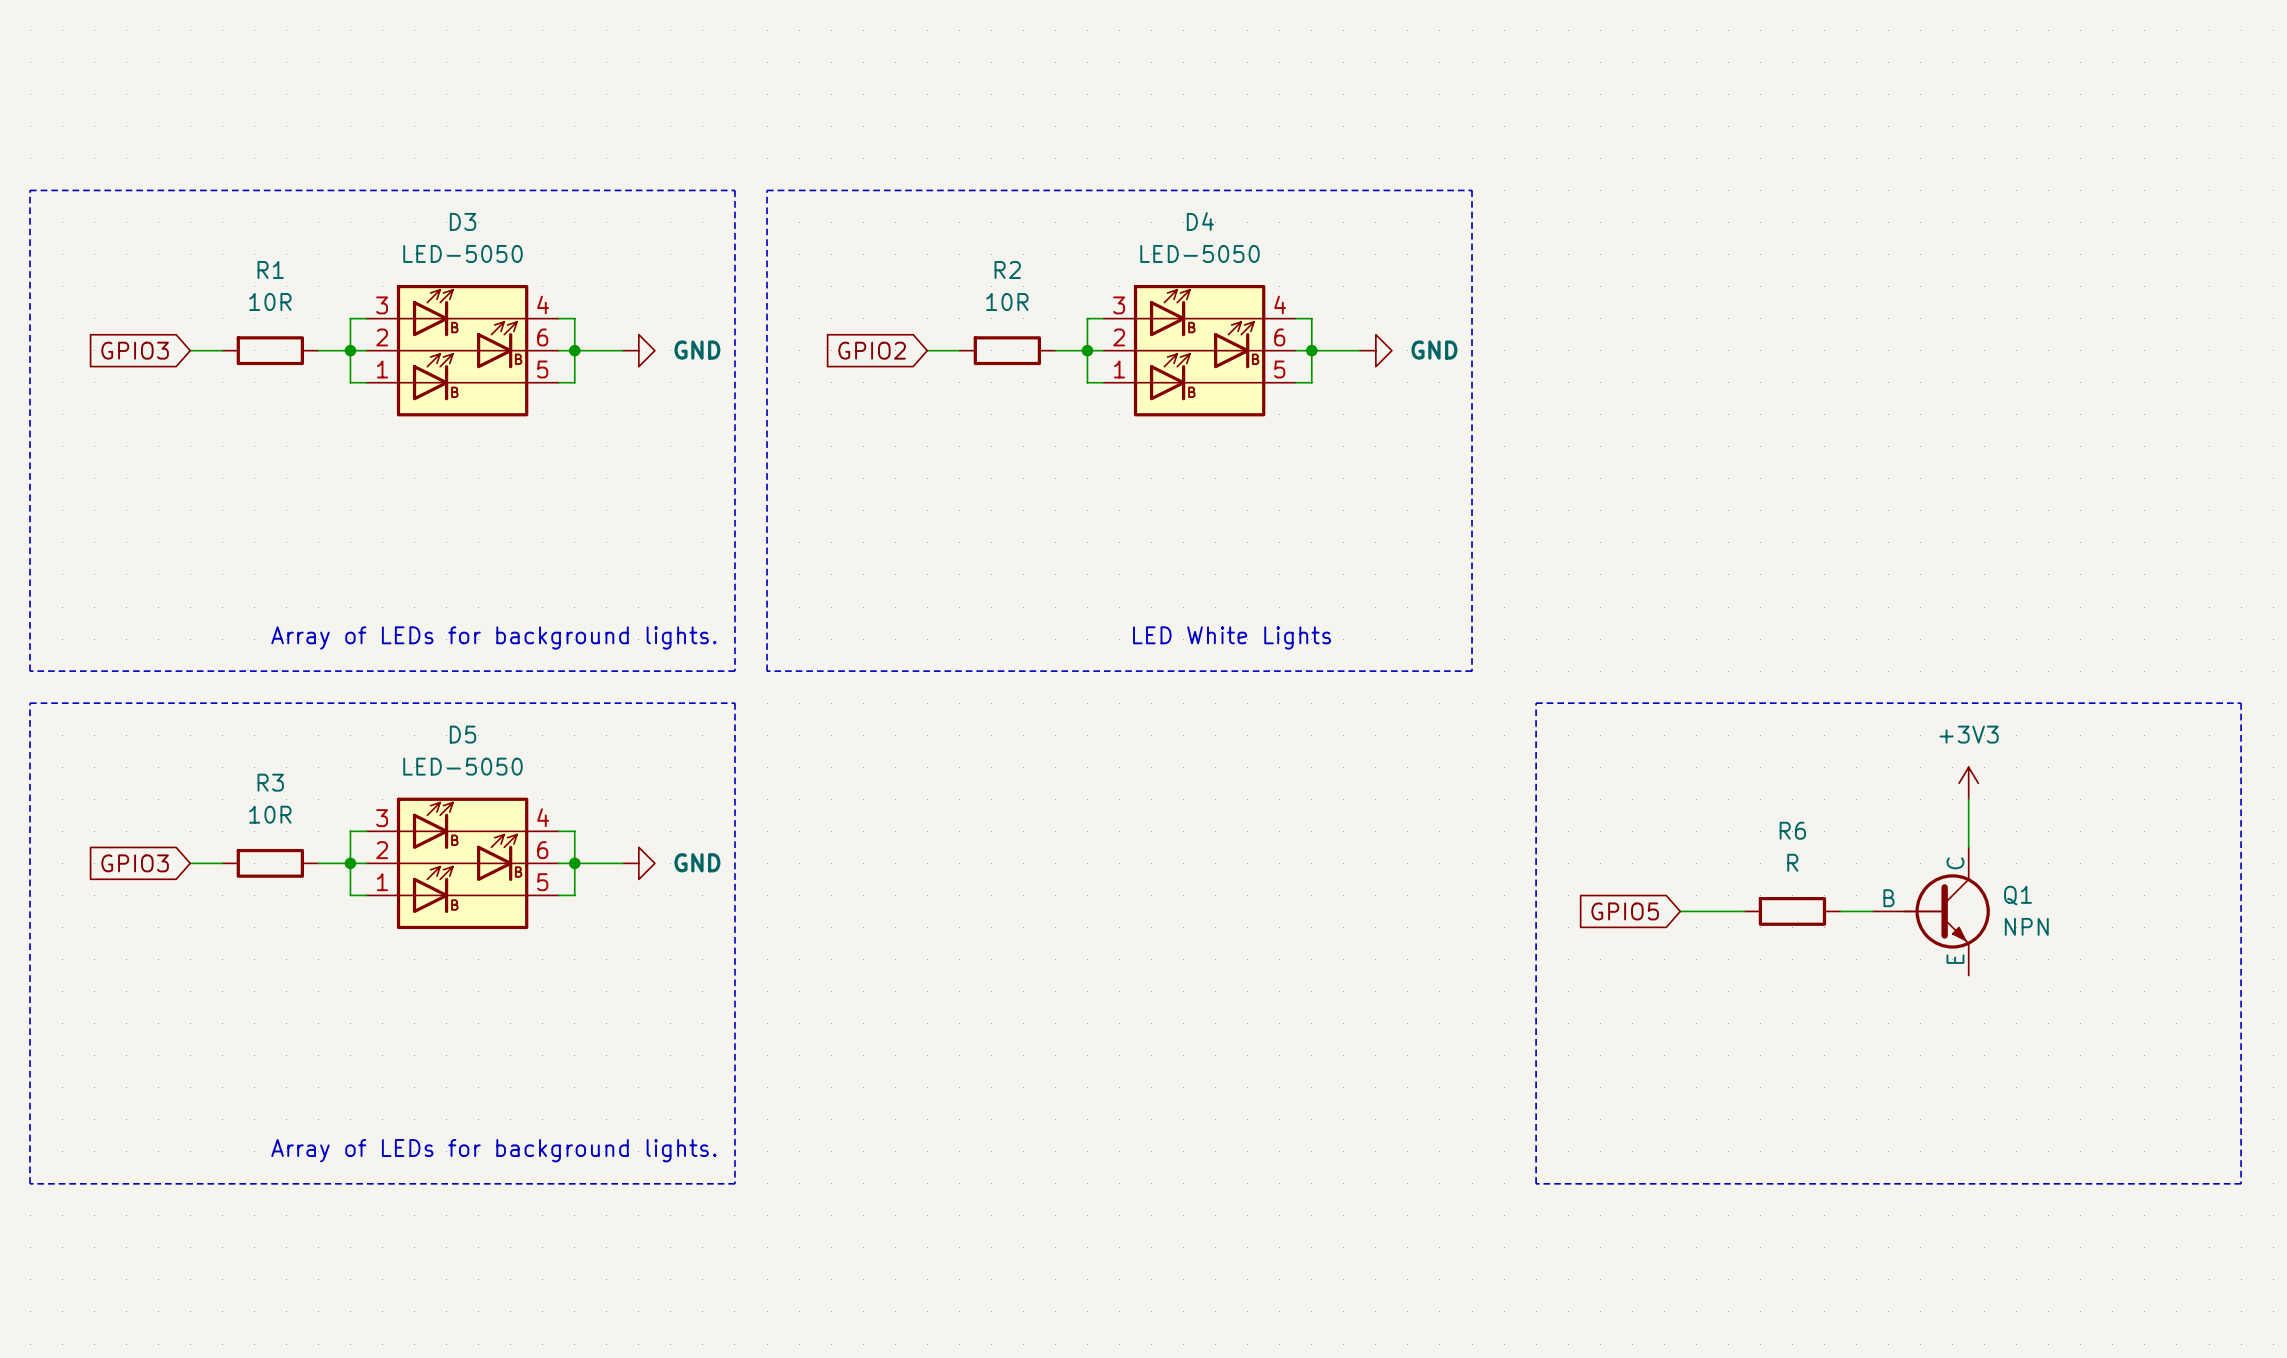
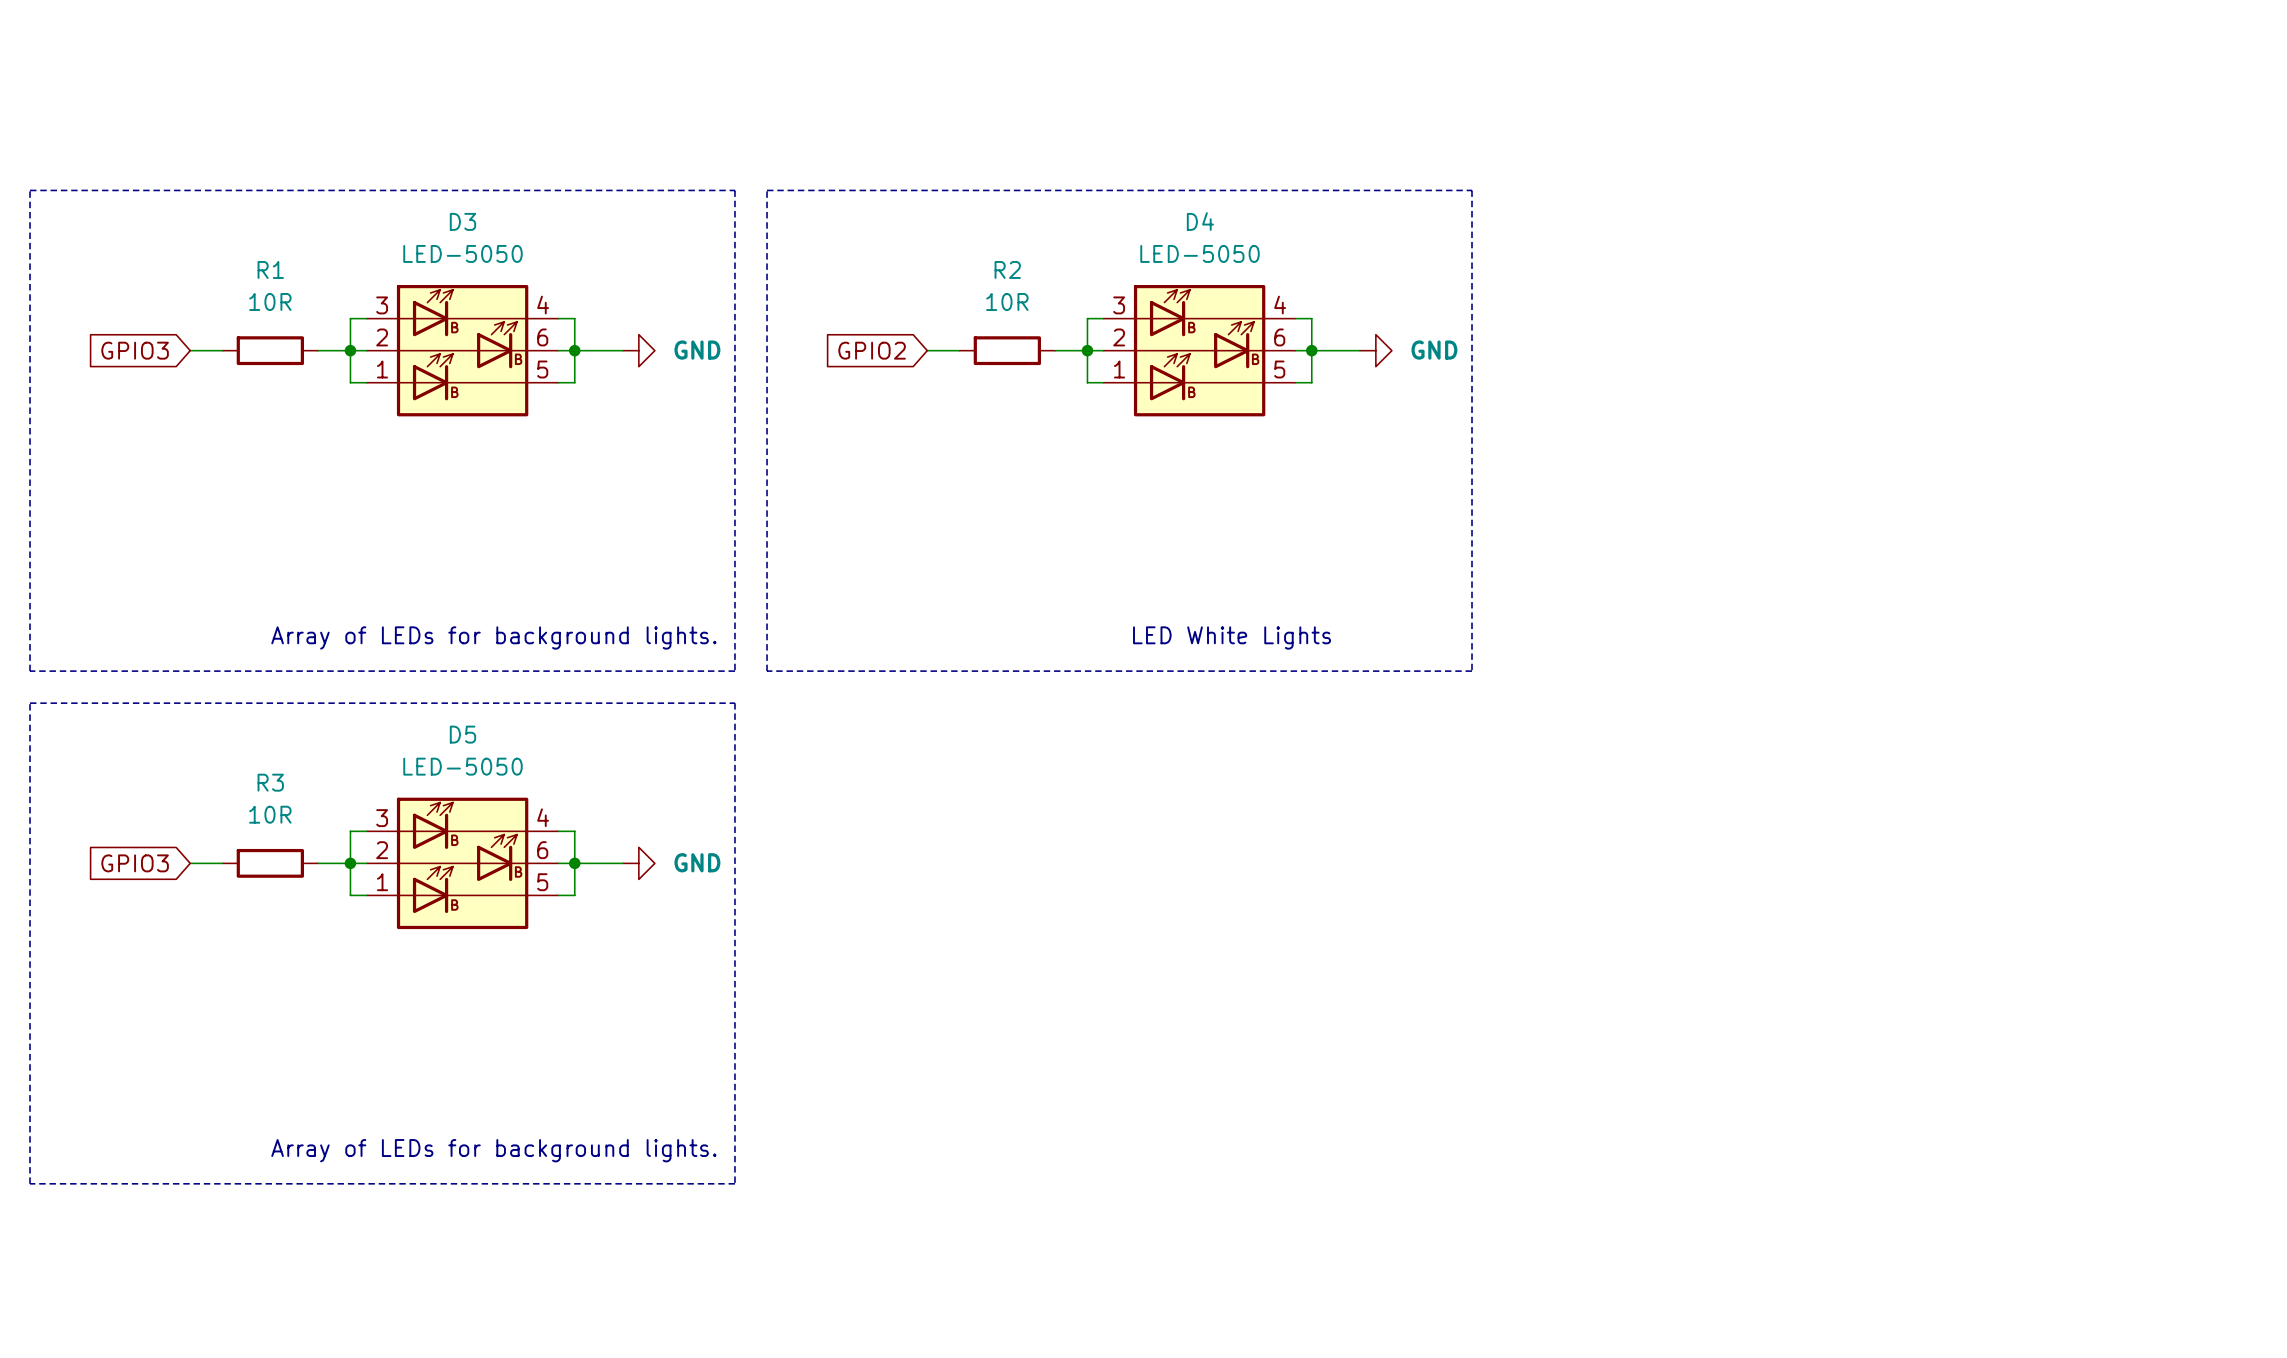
line: (1536, 703) (2241, 703) (2241, 1183) (1536, 1183) (1536, 703) -> none
power symbol: +3V3 (1968, 783) -> none
wire: (1968, 799) (1968, 847) -> none
global label: GPIO5 (1625, 911) -> none
wire: (1680, 911) (1744, 911) -> none
R6: R (1792, 911) -> none
wire: (1840, 911) (1872, 911) -> none
Q1: NPN (1931, 911) -> none

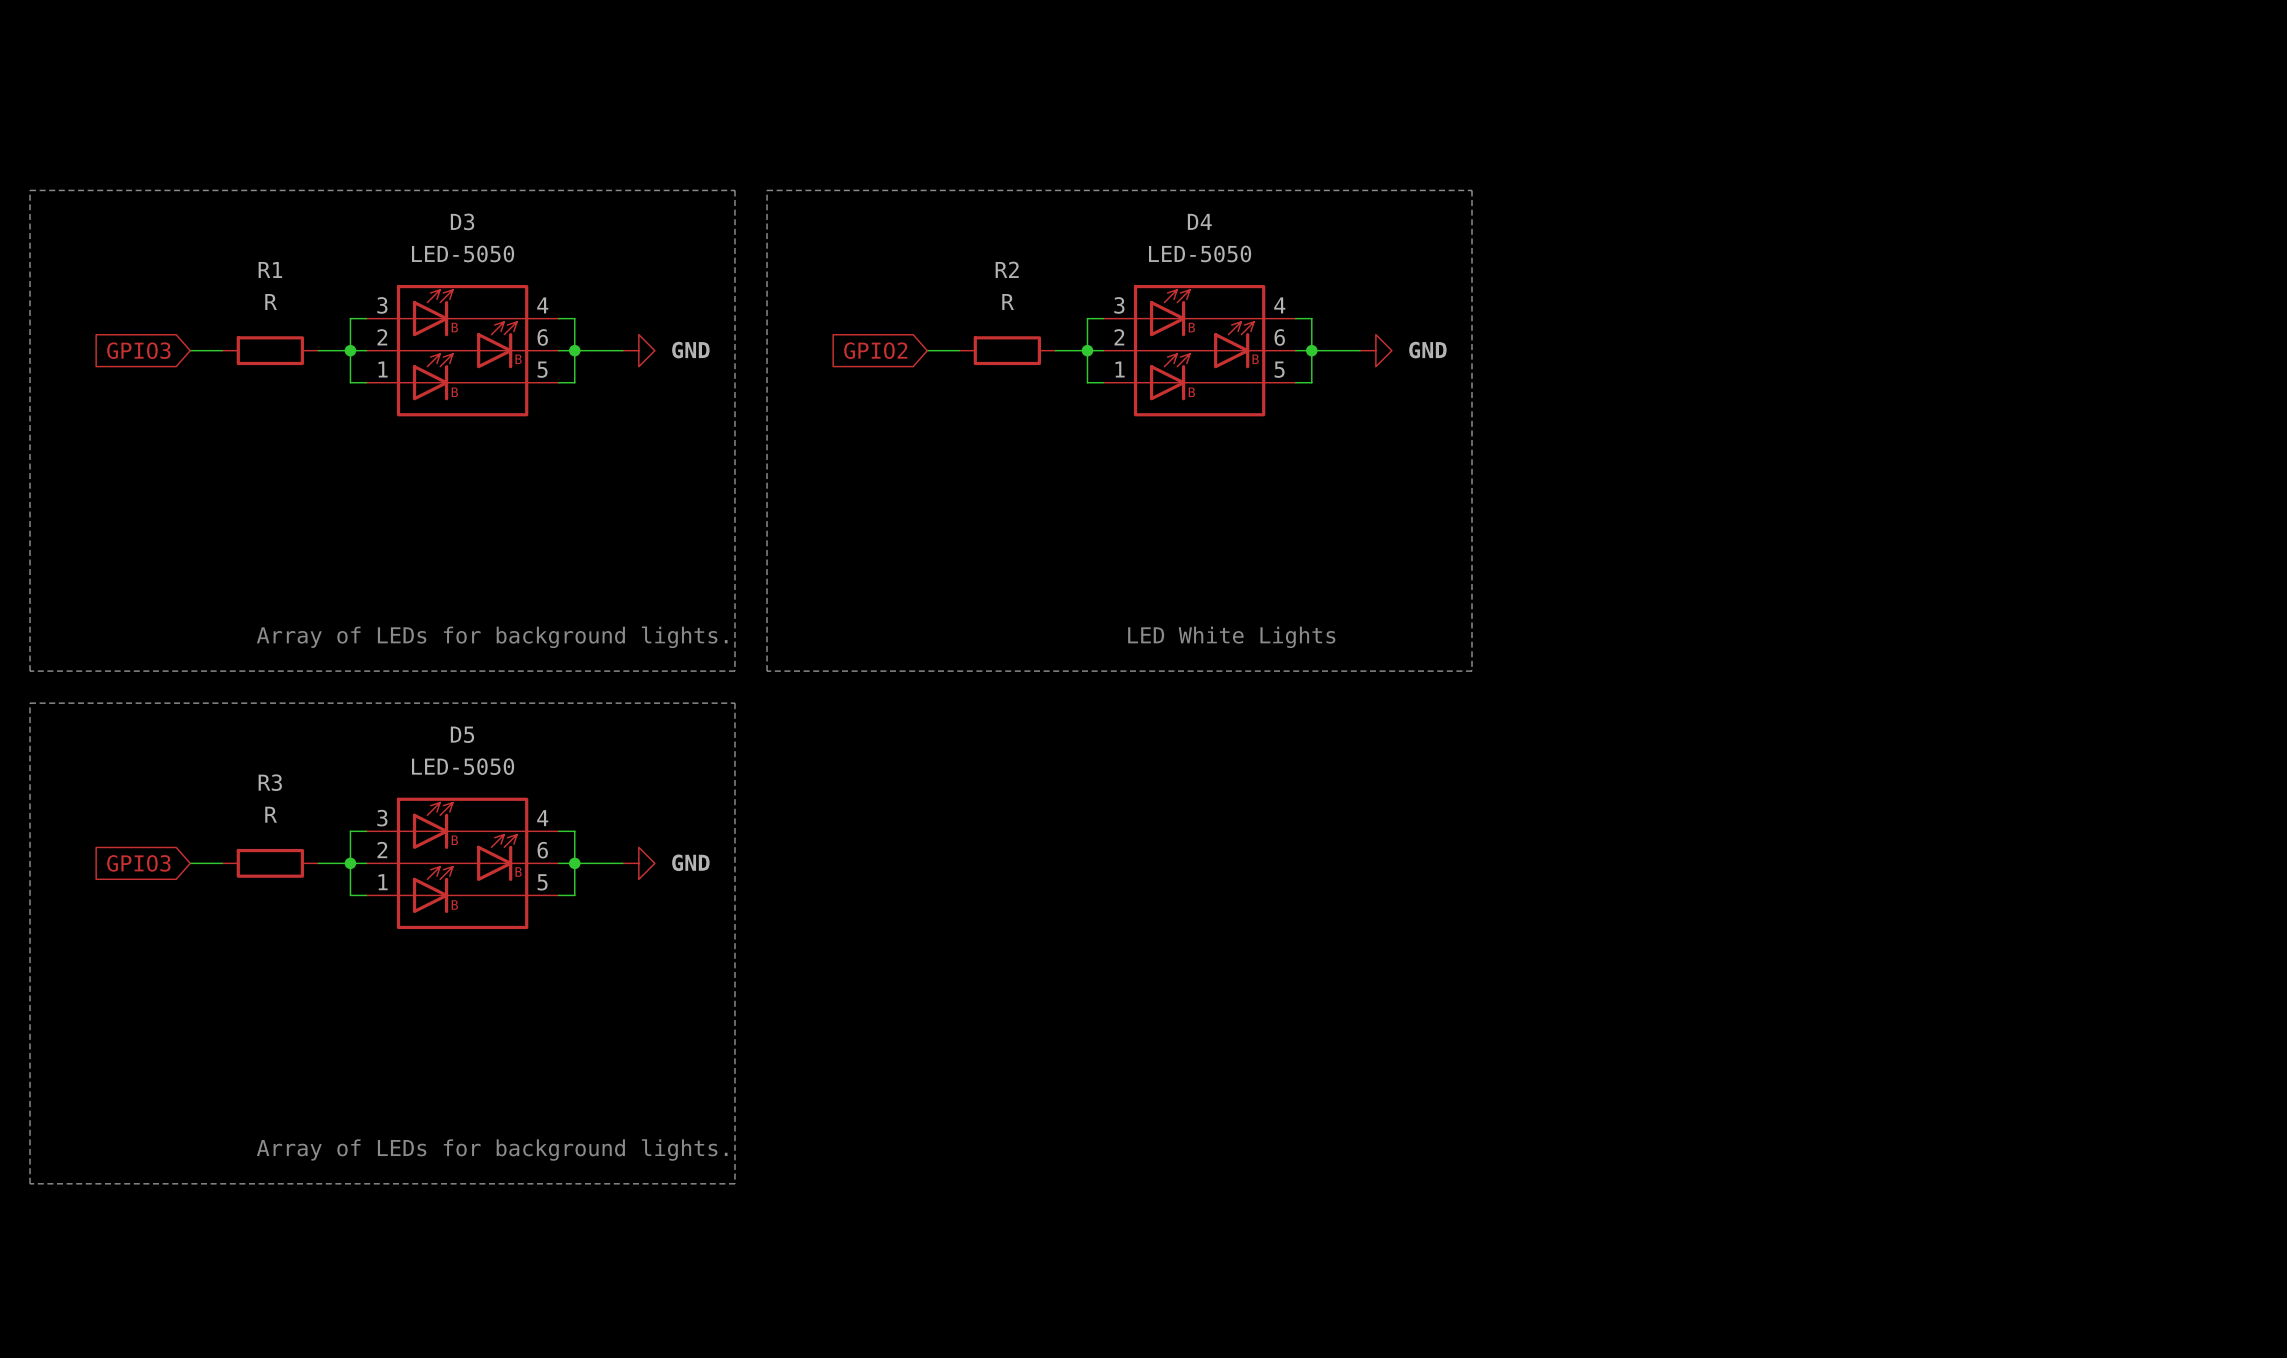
R1 value: 10R (270, 302) -> R (271, 302)
R2 value: 10R (1007, 302) -> R (1008, 302)
R3 value: 10R (270, 814) -> R (271, 814)

